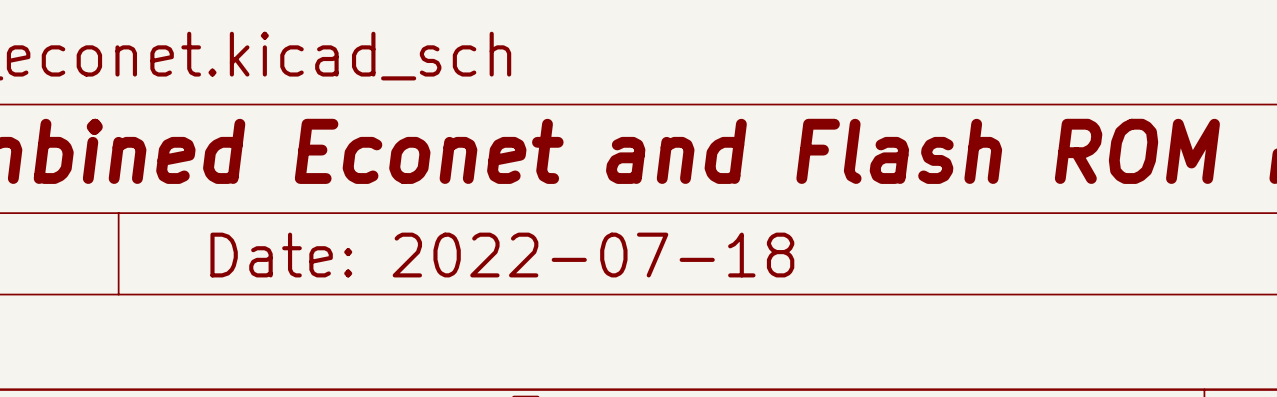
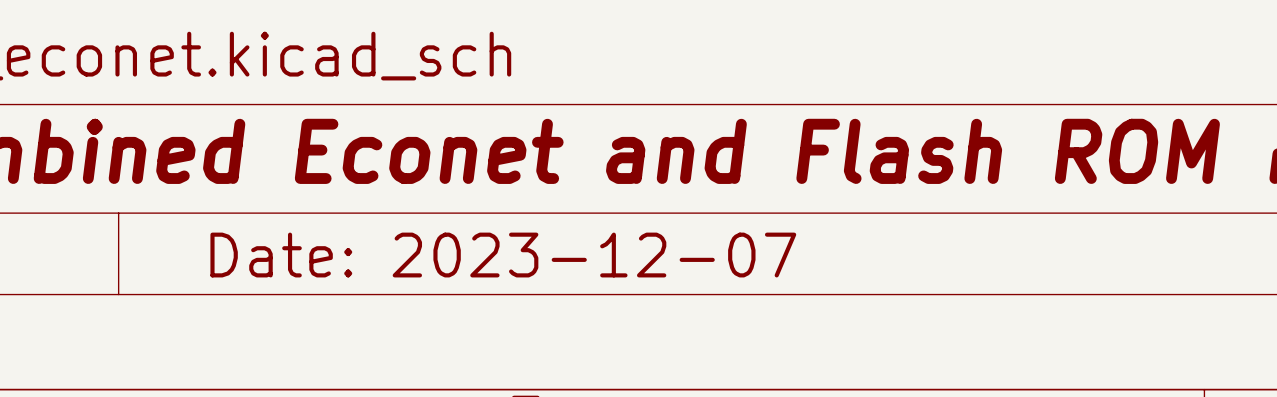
title block: Date: 2022-07-18 (502, 255) -> Date: 2023-12-07 (503, 255)

